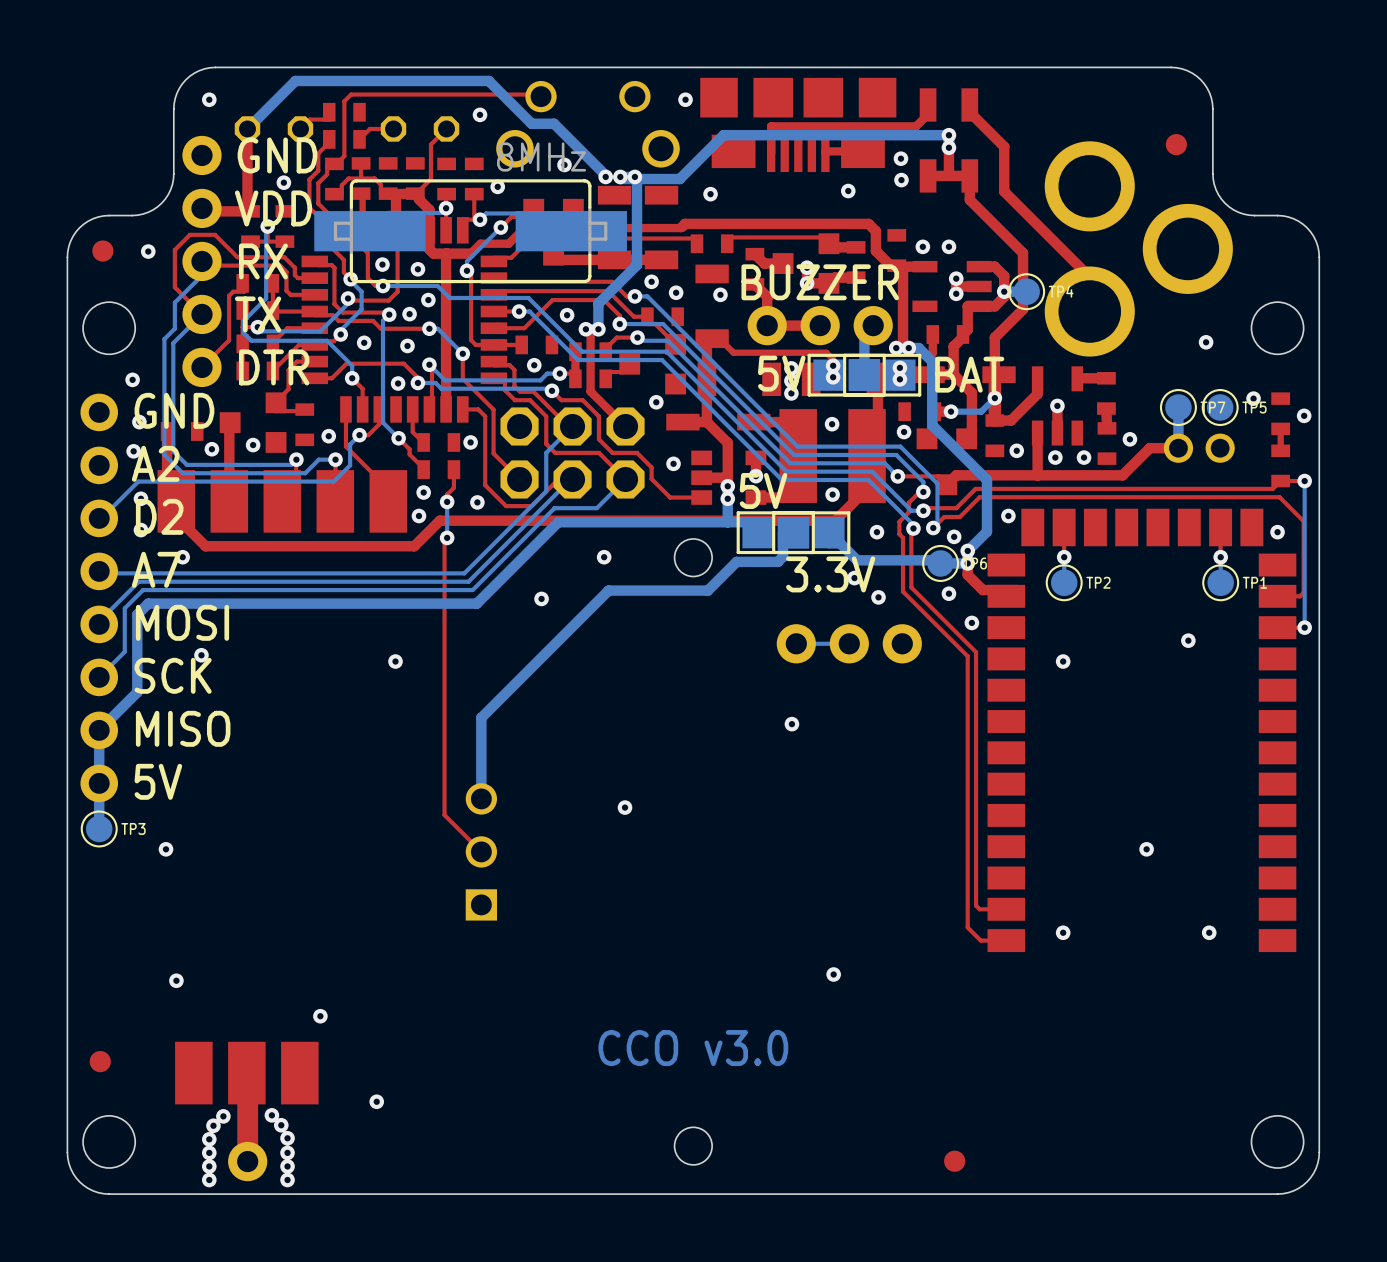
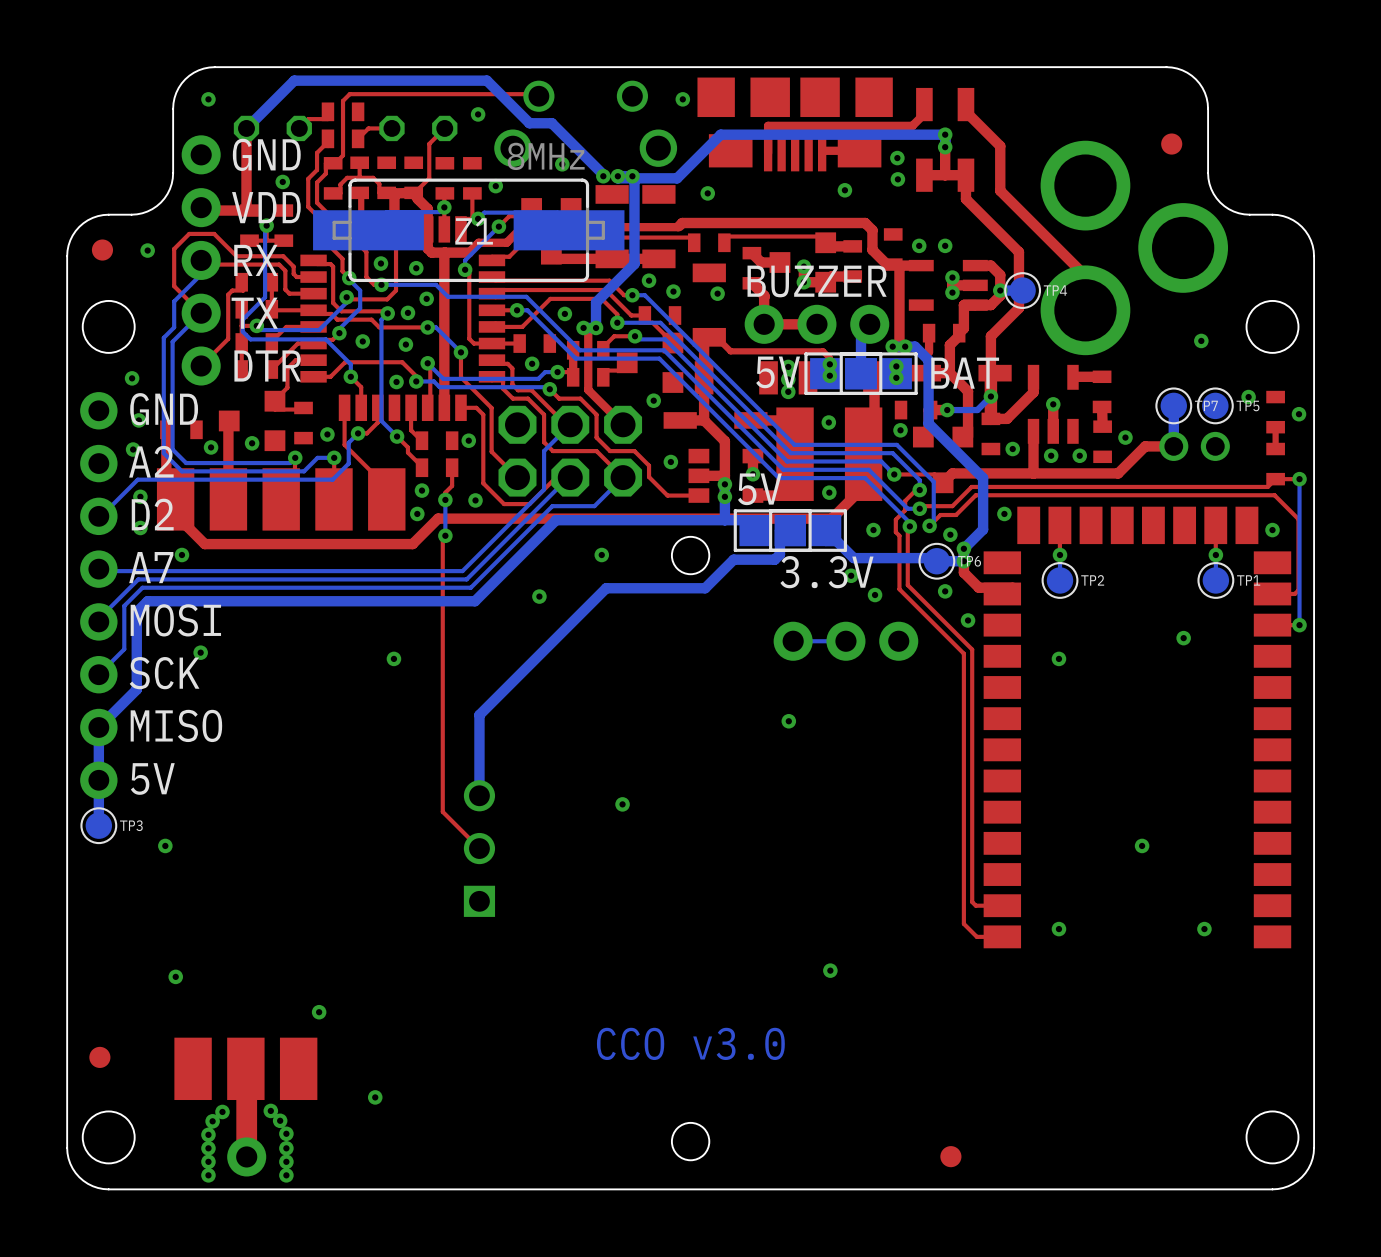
Z1 name: none -> Z1 (474, 231)

